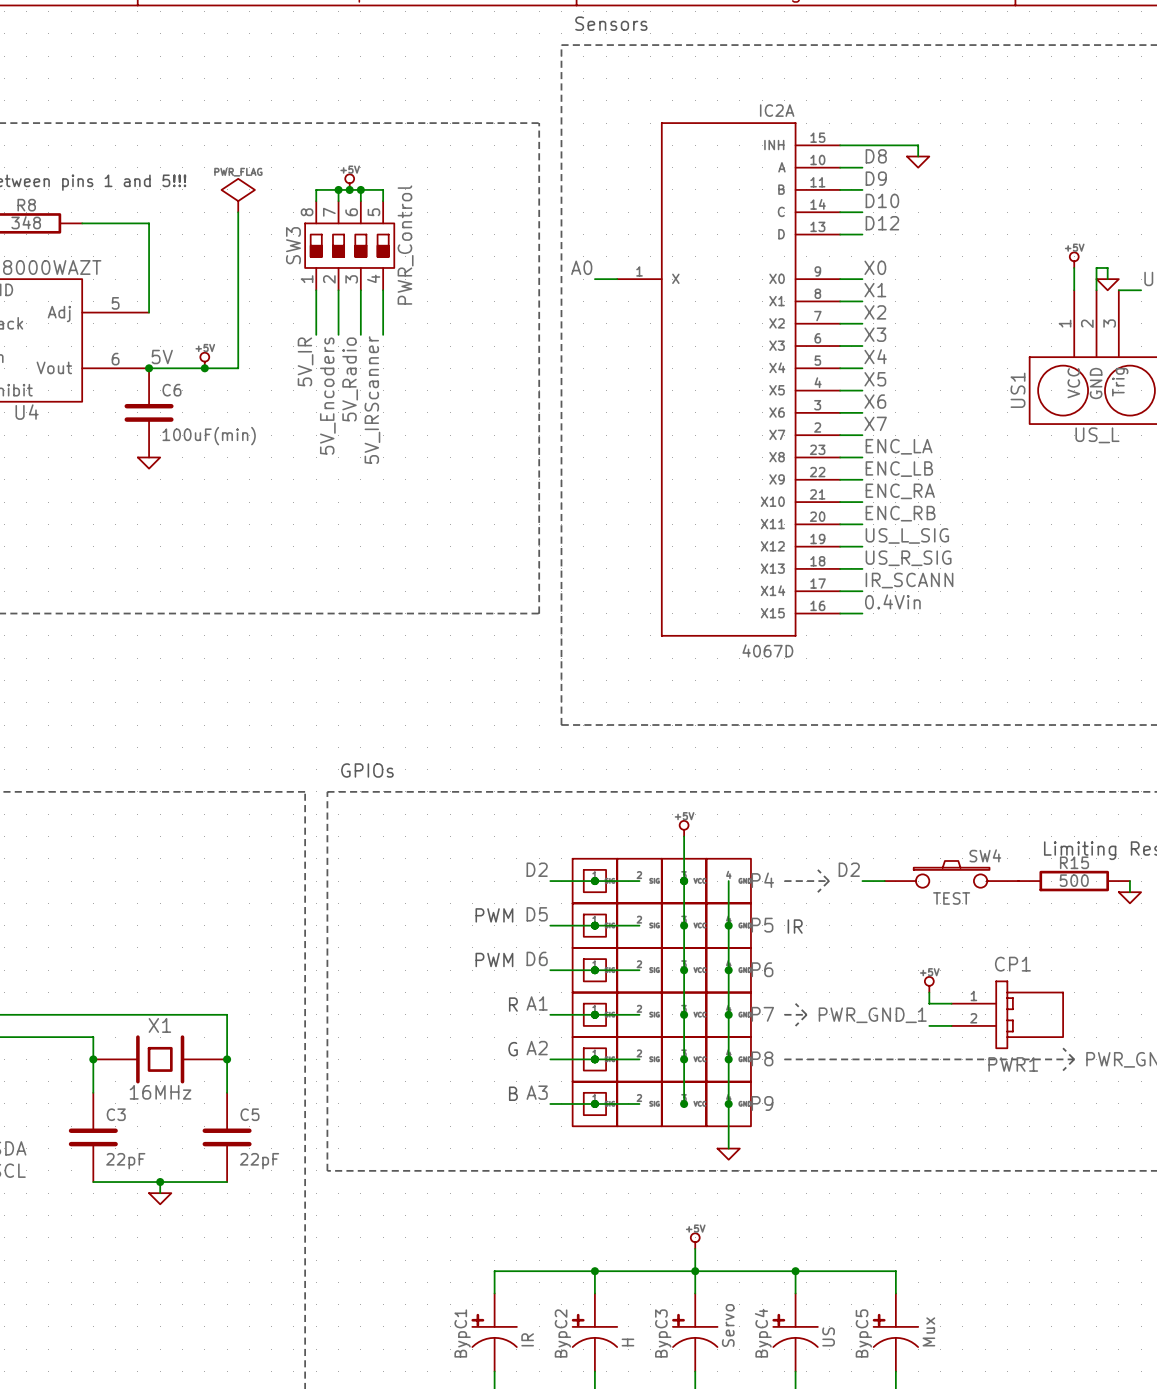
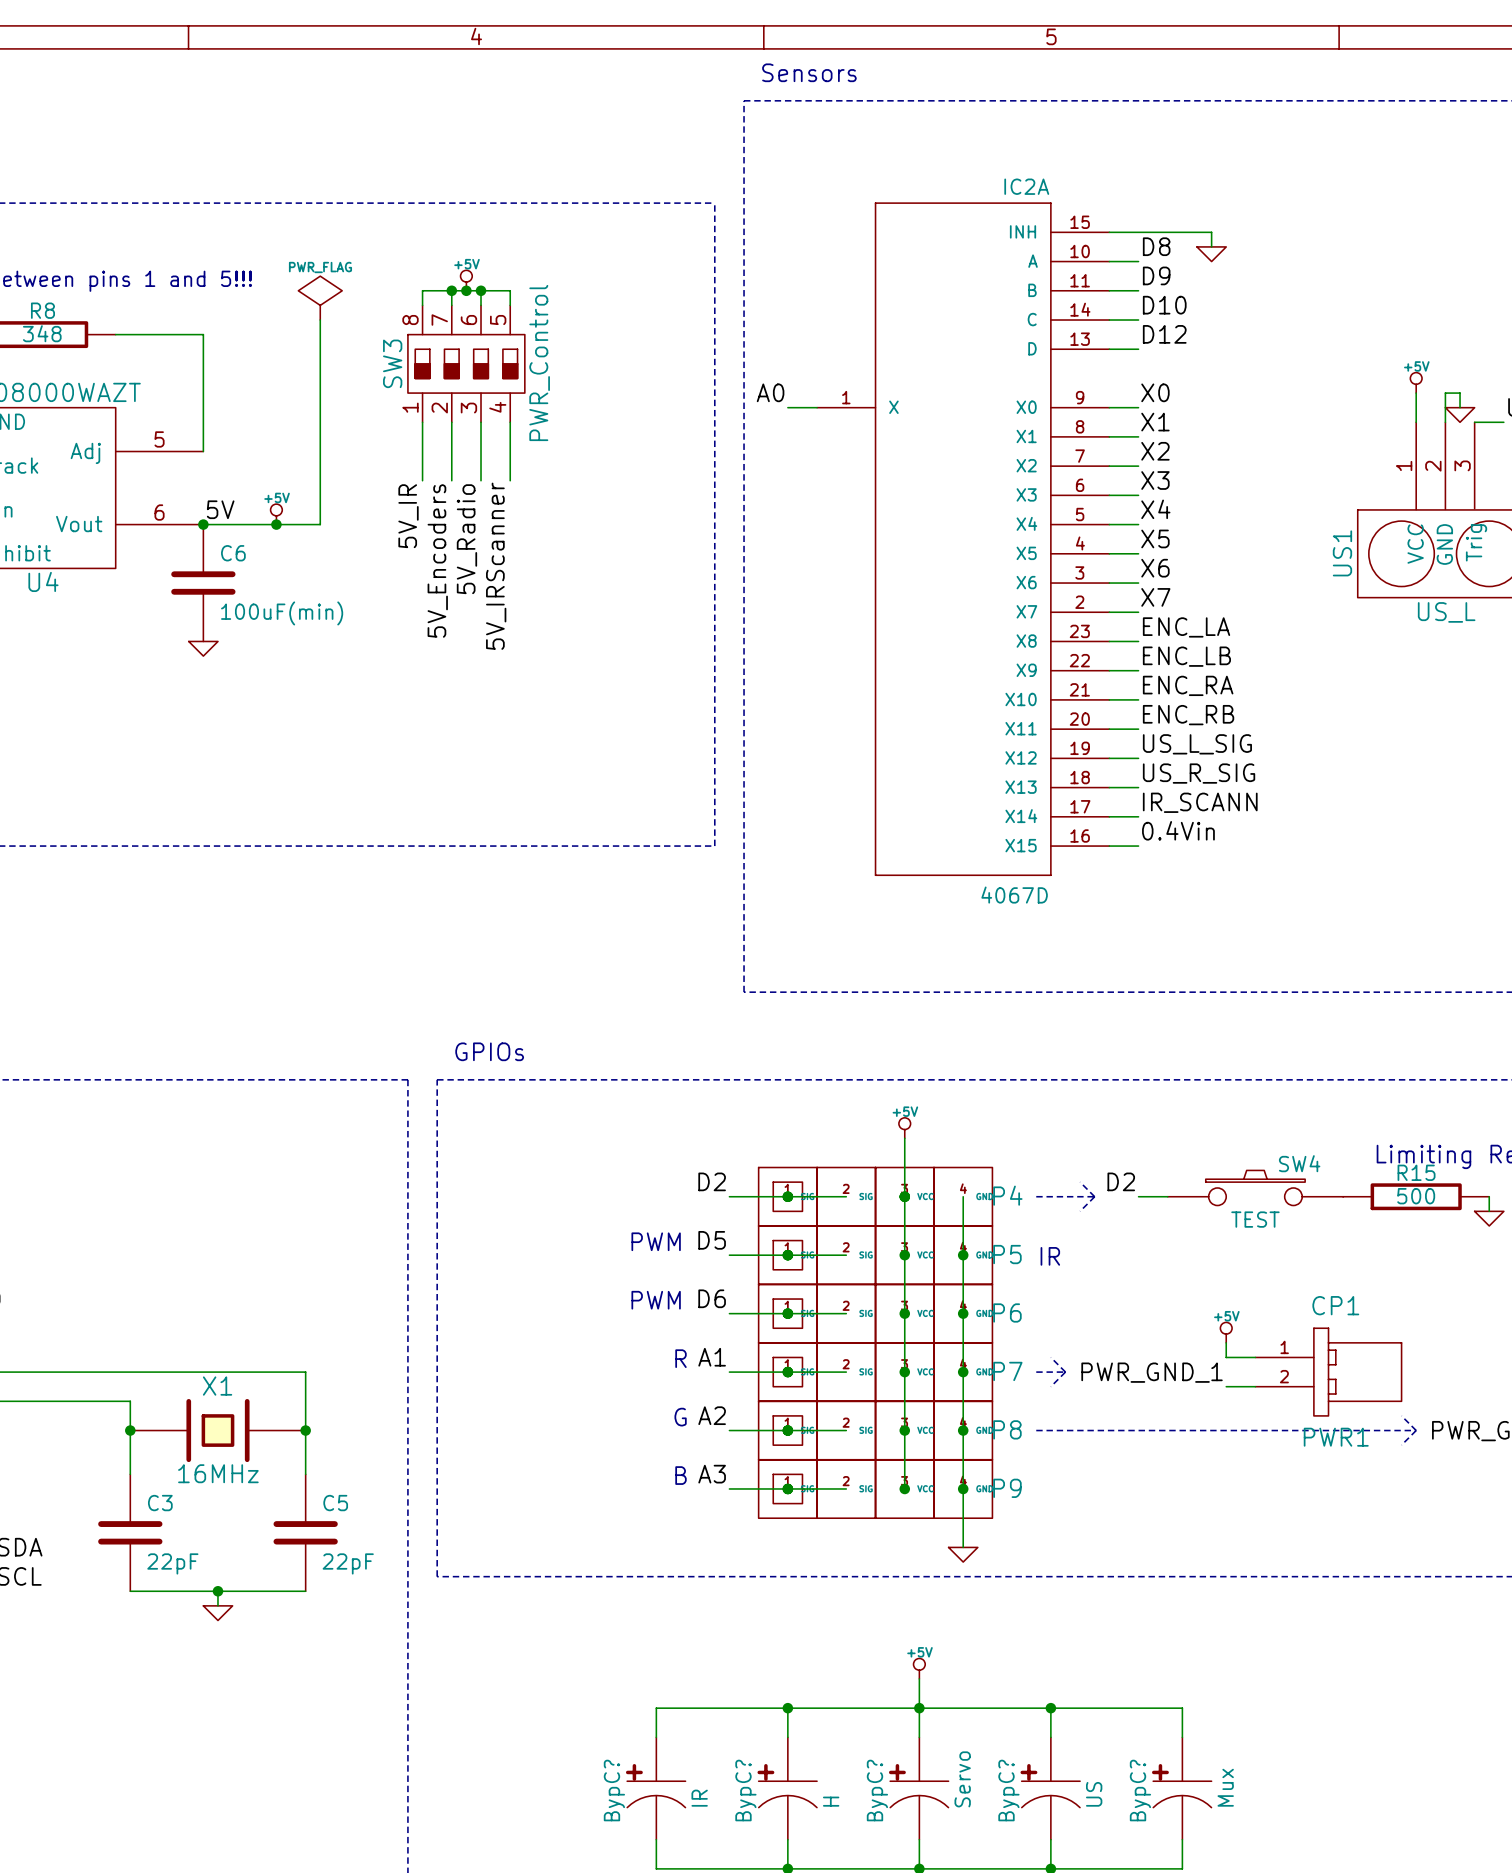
BypC1 name: BypC1 (462, 1333) -> BypC? (614, 1790)
BypC2 name: BypC2 (562, 1333) -> BypC? (745, 1790)
BypC3 name: BypC3 (663, 1333) -> BypC? (877, 1790)
BypC4 name: BypC4 (763, 1333) -> BypC? (1008, 1790)
BypC5 name: BypC5 (863, 1333) -> BypC? (1140, 1790)

